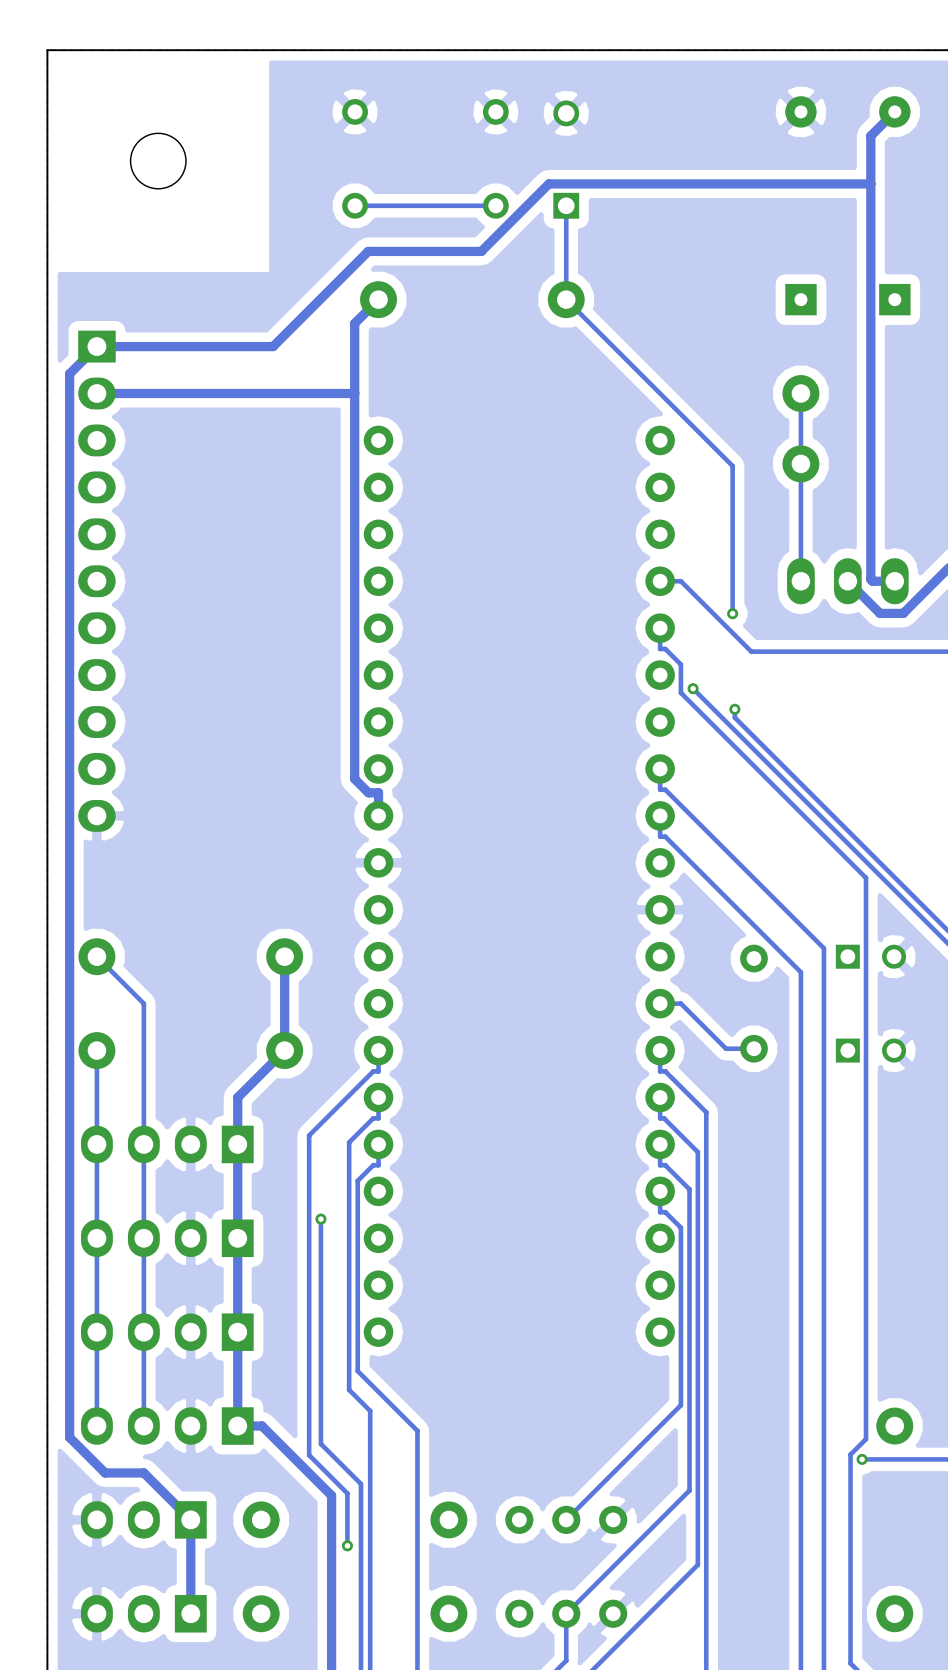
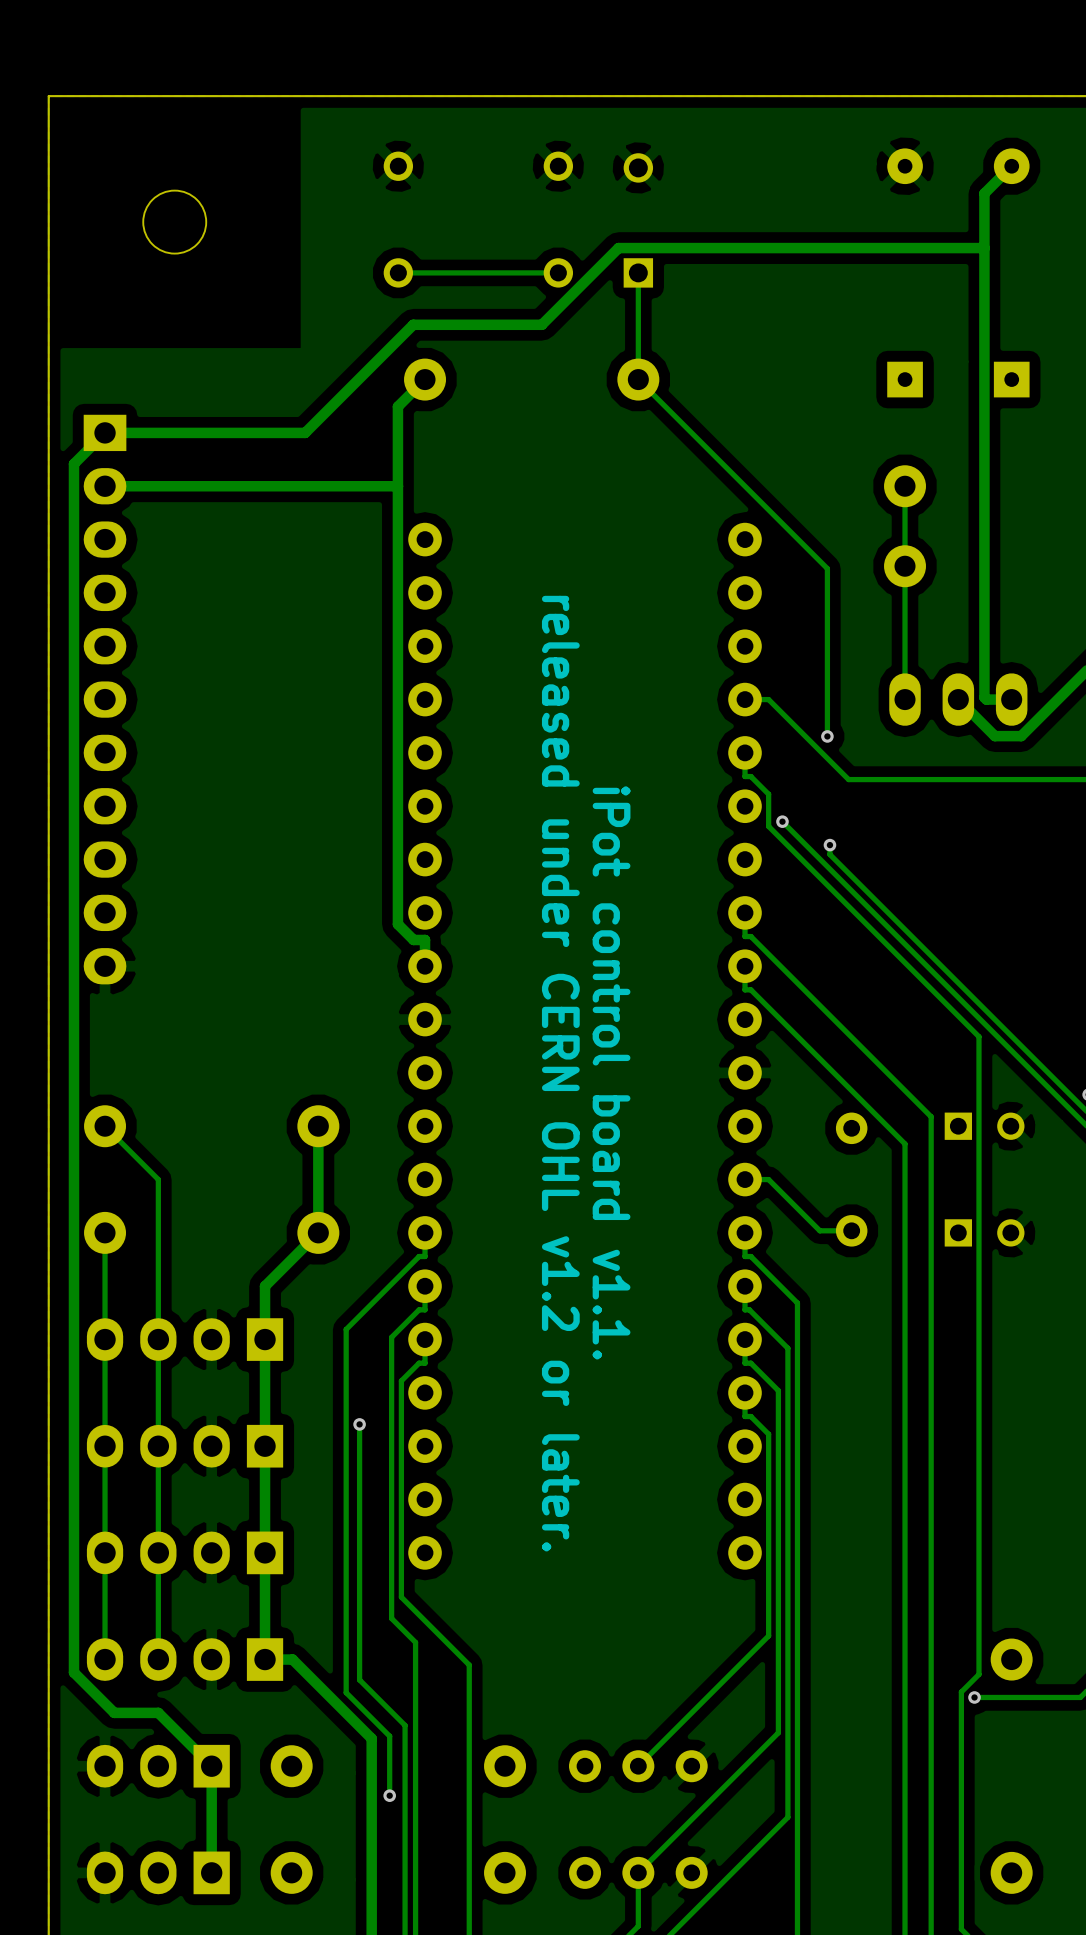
text: none -> iPot control board v1.1. (611, 1072)
text: none -> released under CERN OHL v1.2 or later. (560, 1073)

